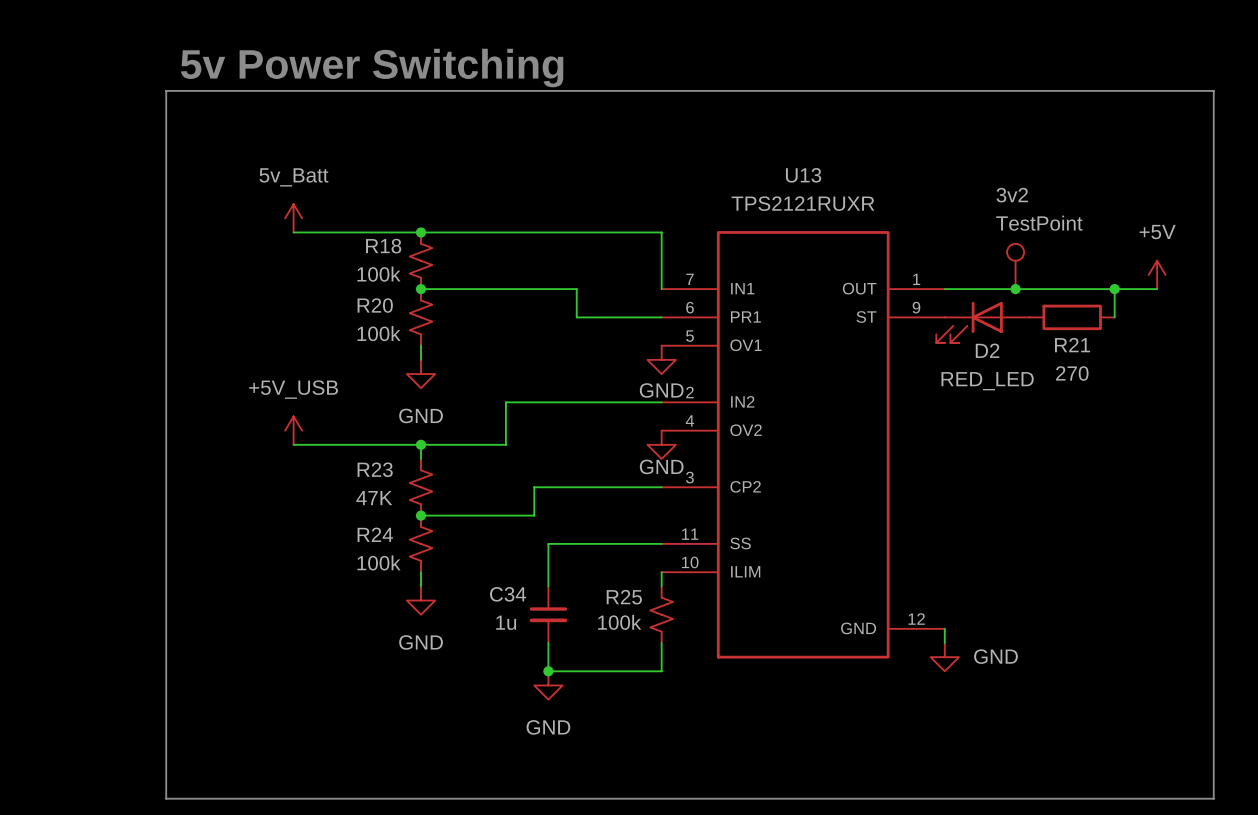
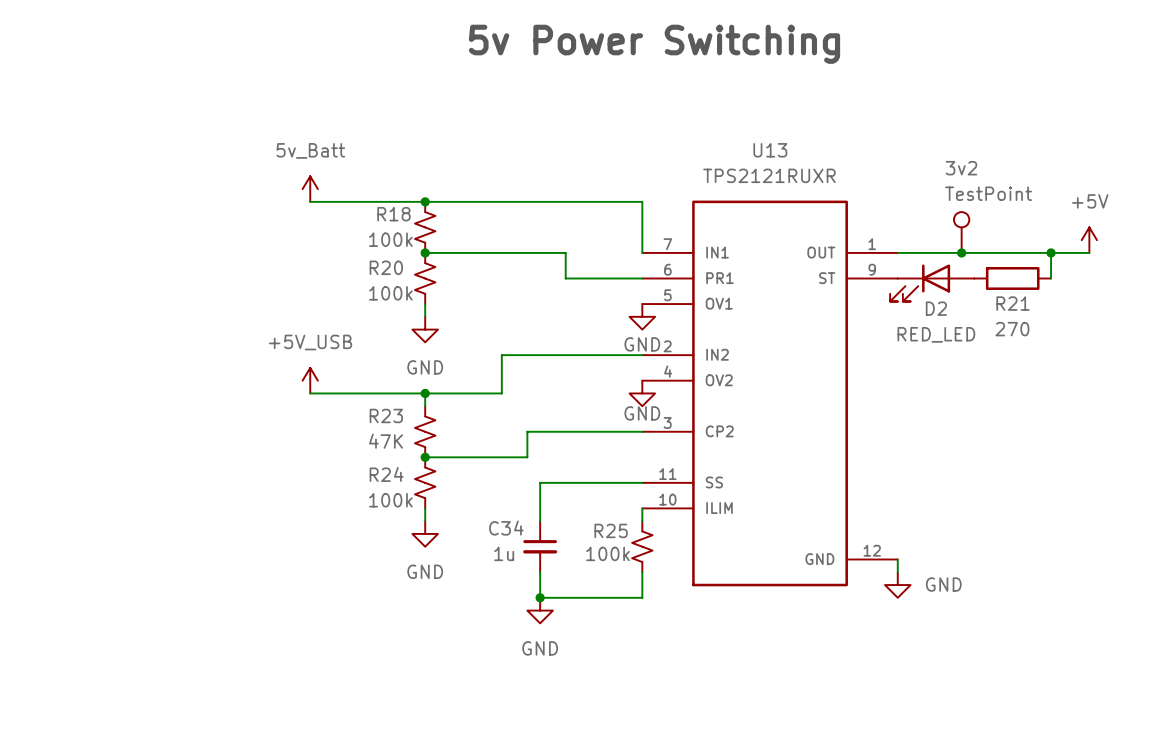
text: none -> 5v Power Switching (654, 44)
text: 5v Power Switching (372, 68) -> none
line: (166, 90) (1213, 90) (1213, 798) (166, 798) (166, 90) -> none

